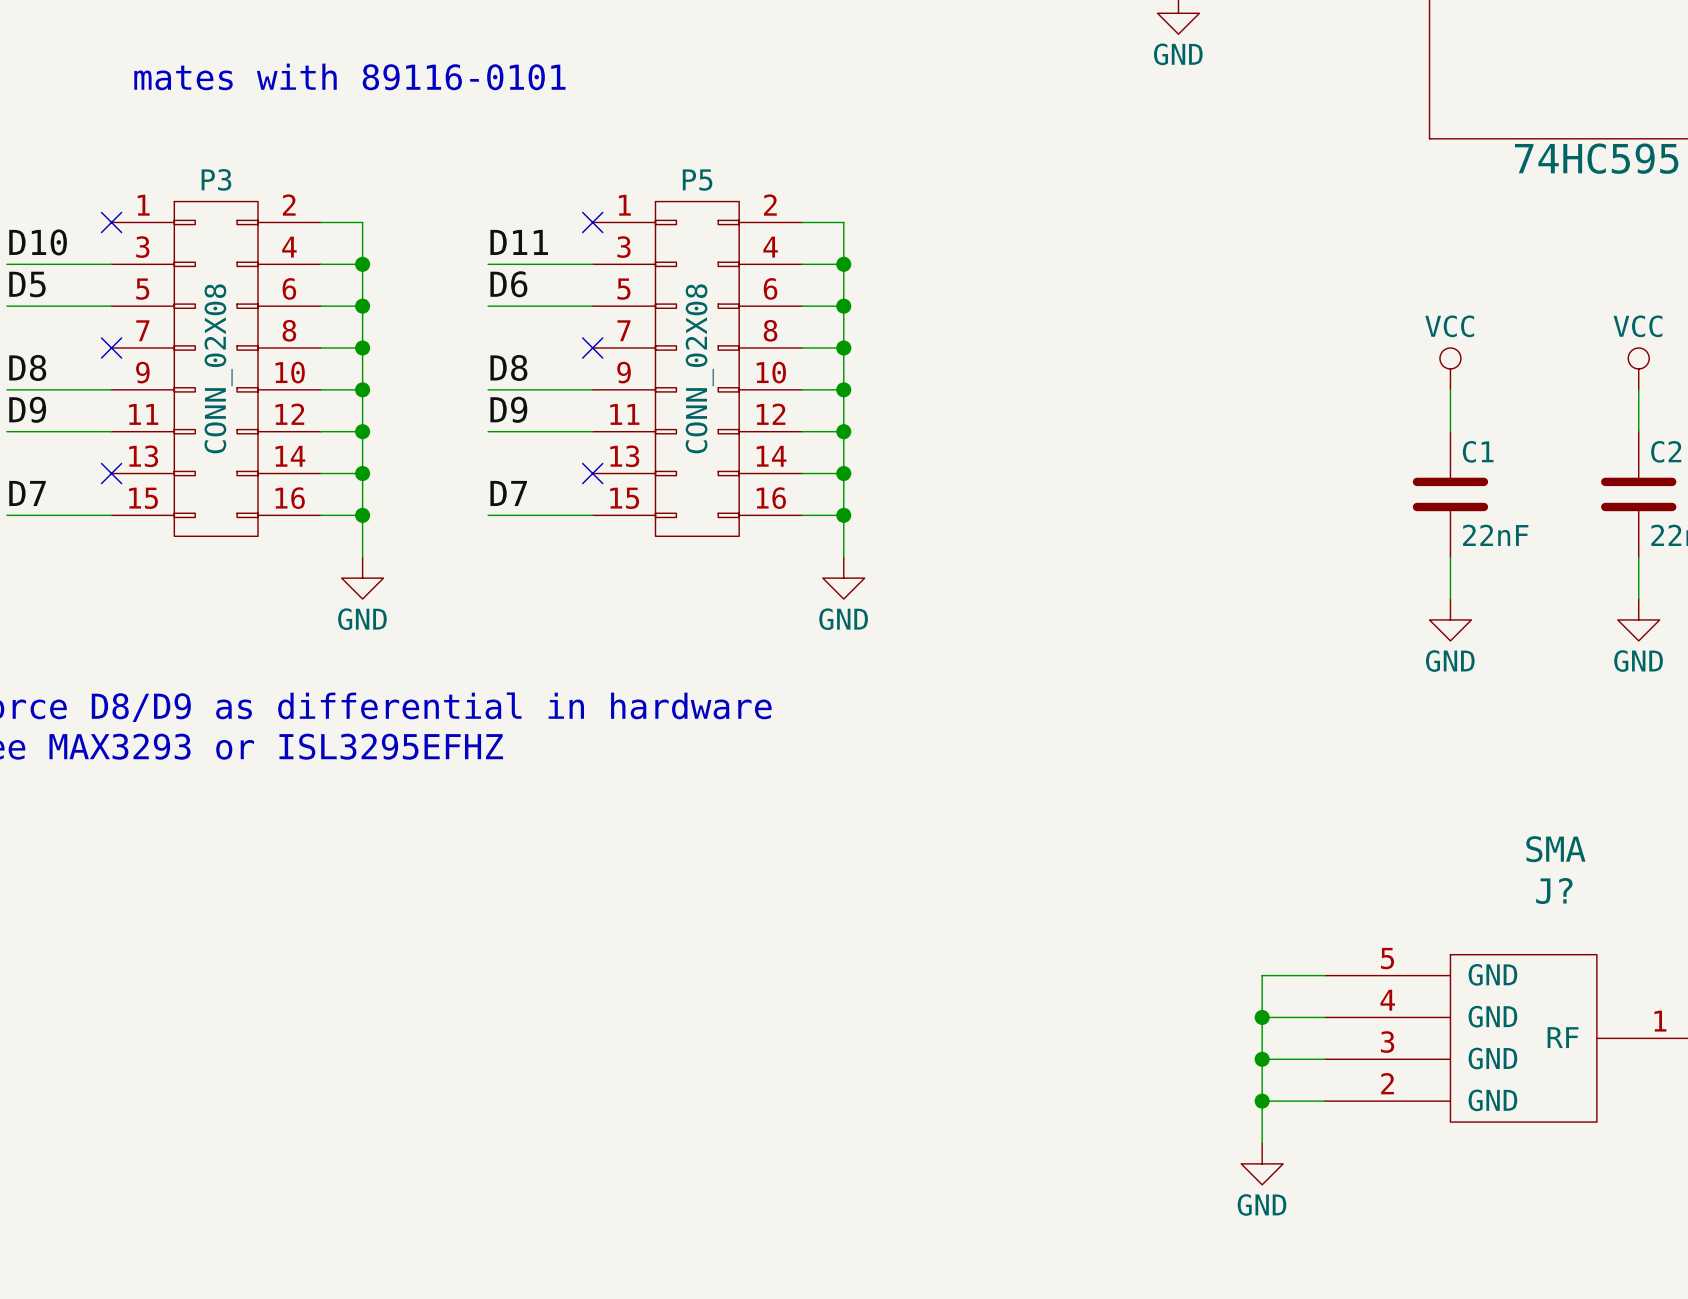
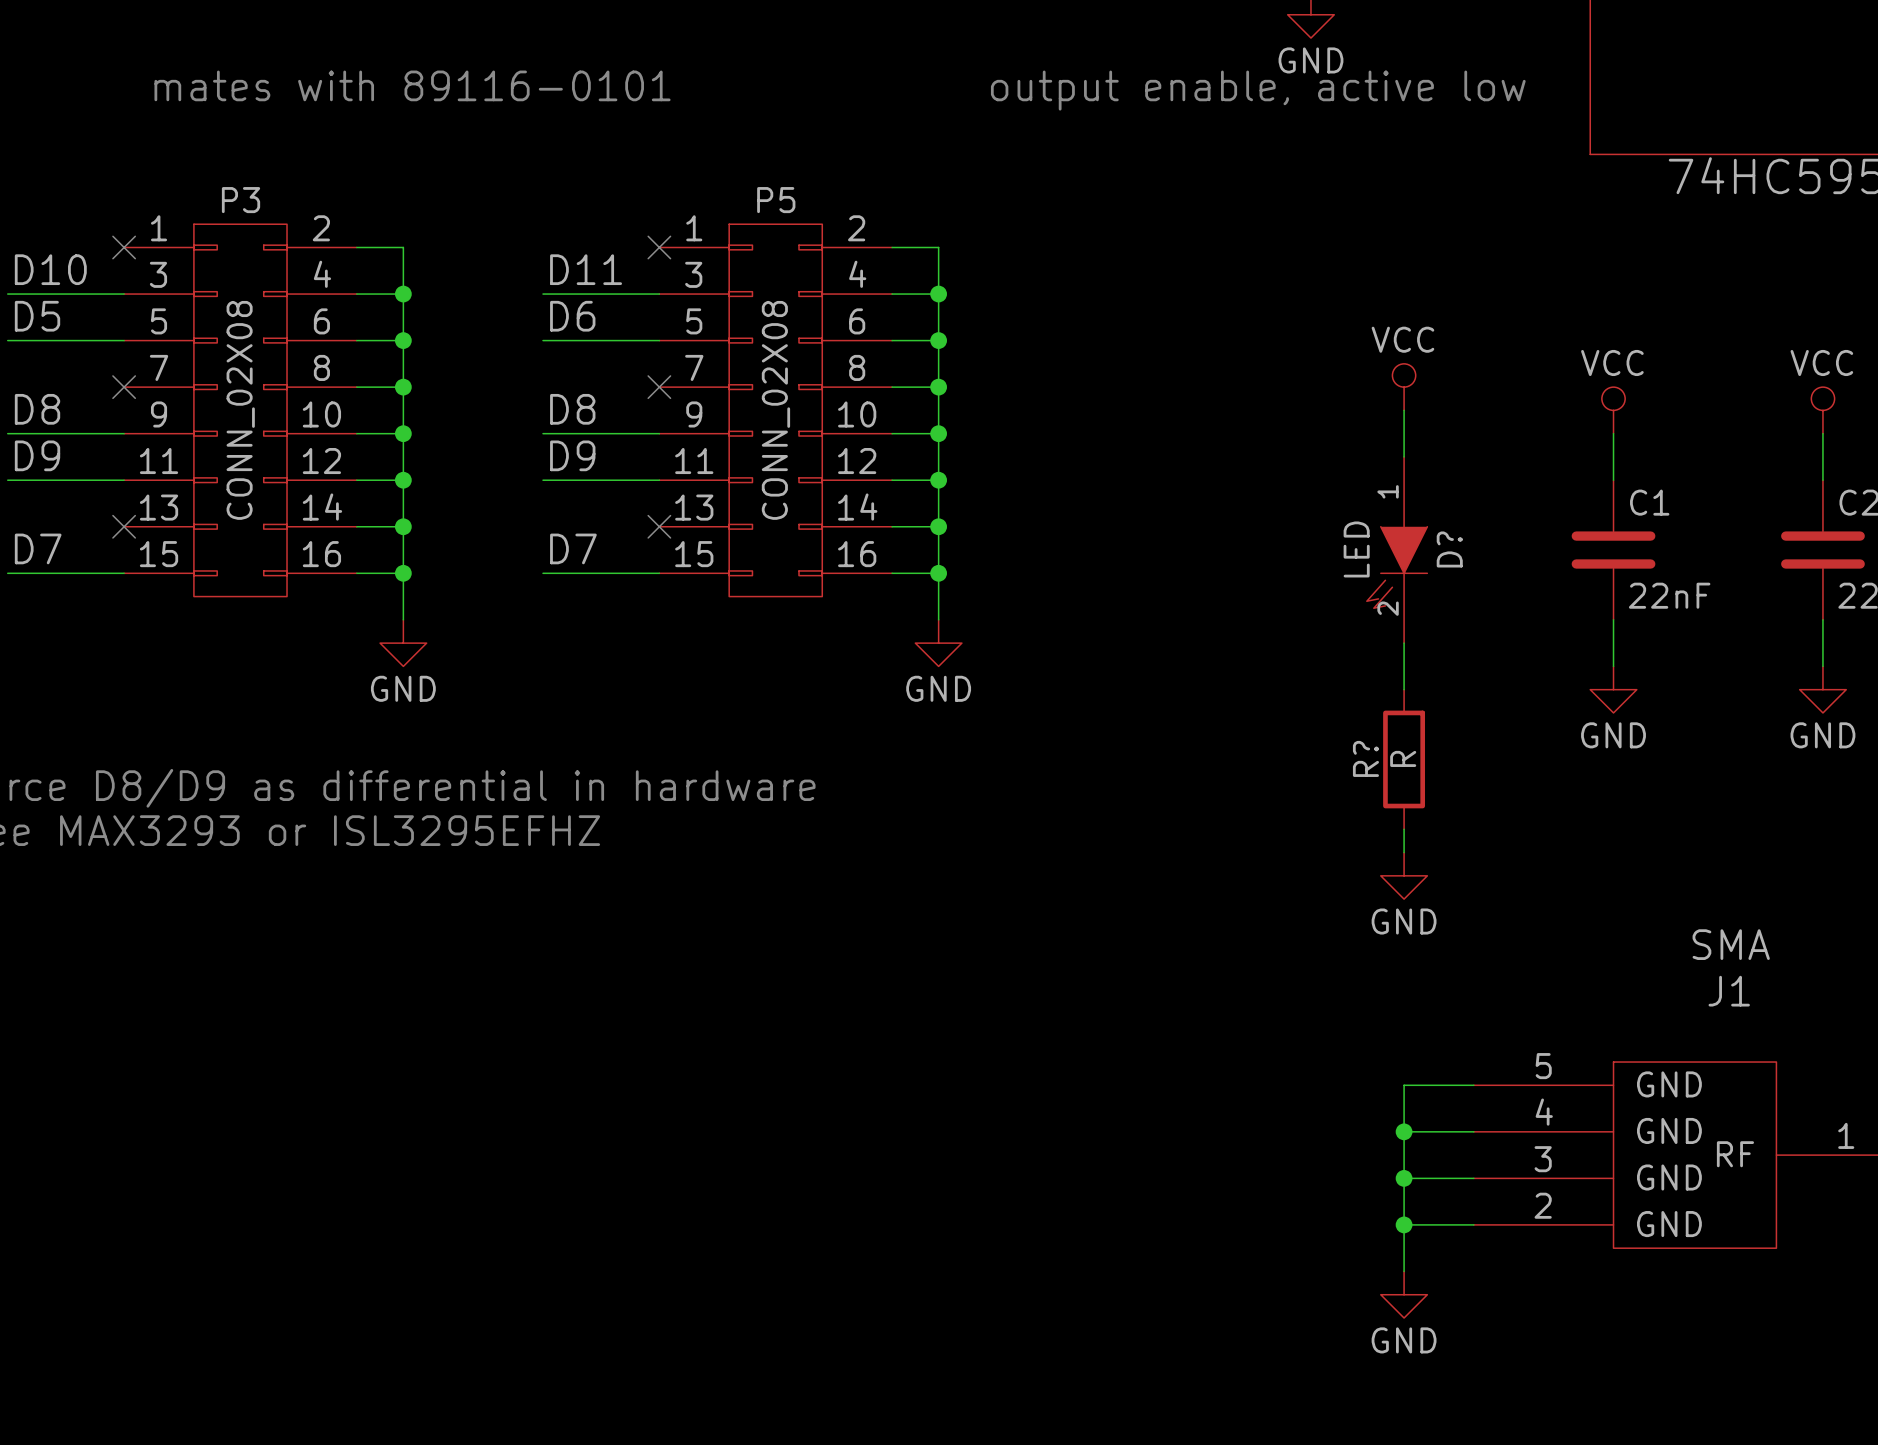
text: none -> output enable, active low (1258, 90)
power symbol: none -> VCC (1404, 387)
wire: none -> (1404, 410) (1404, 456)
D?: none -> LED (1397, 550)
wire: none -> (1404, 643) (1404, 689)
R?: none -> R (1404, 759)
wire: none -> (1404, 829) (1404, 852)
power symbol: none -> GND (1404, 875)
J? name: J? (1554, 891) -> J1 (1729, 991)

